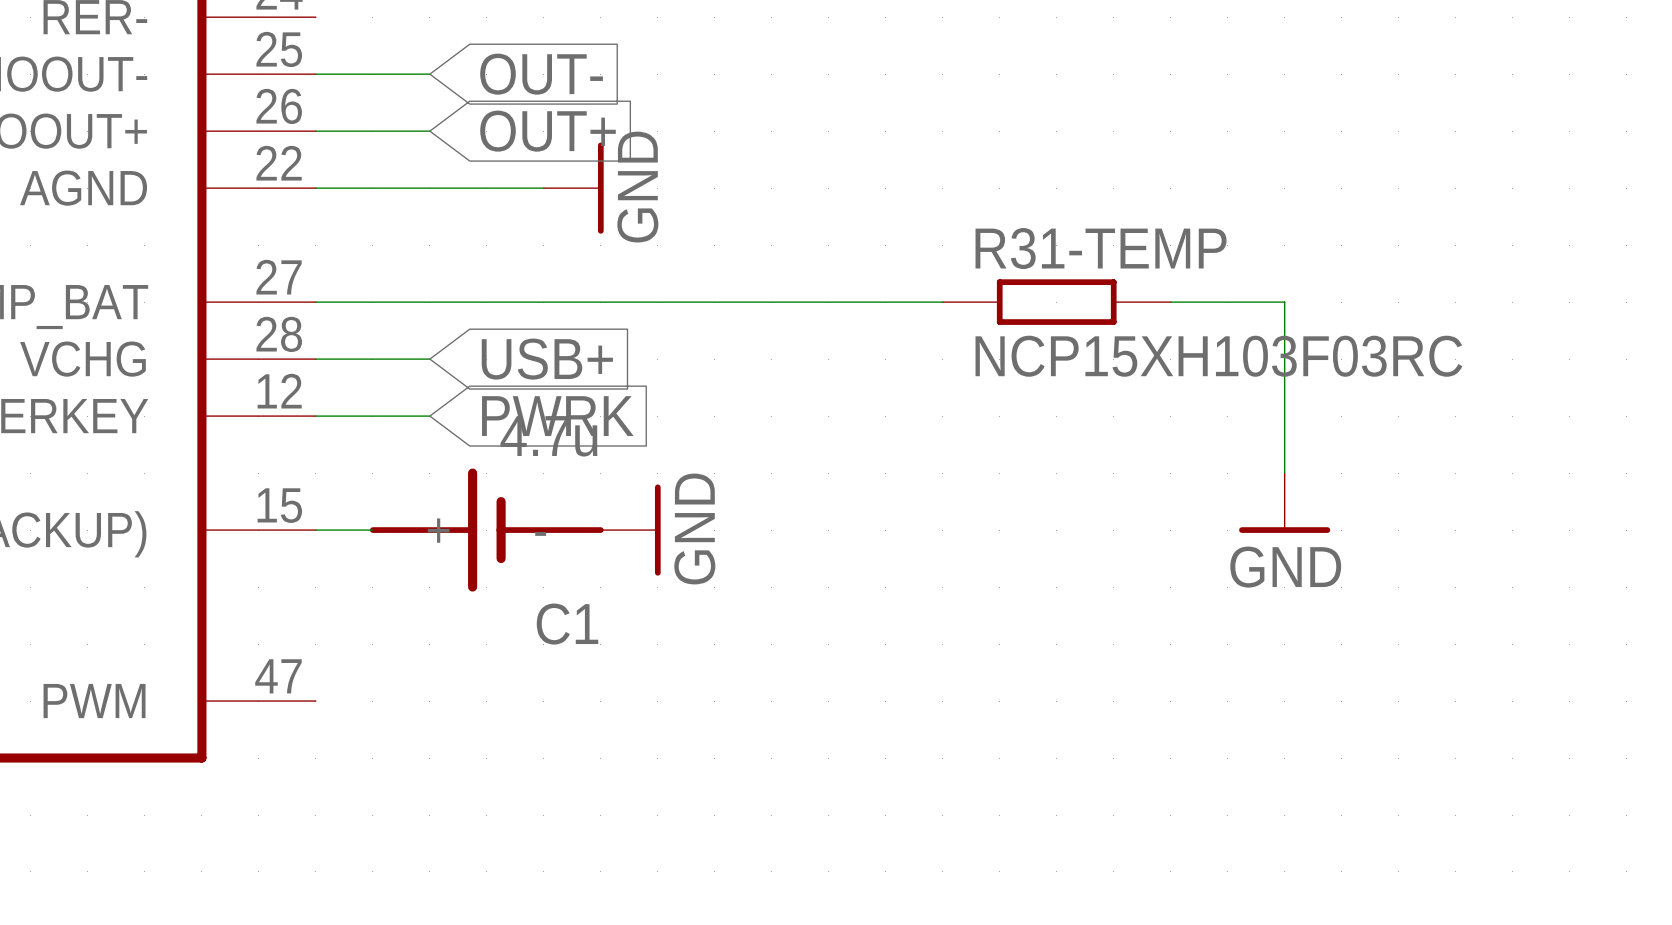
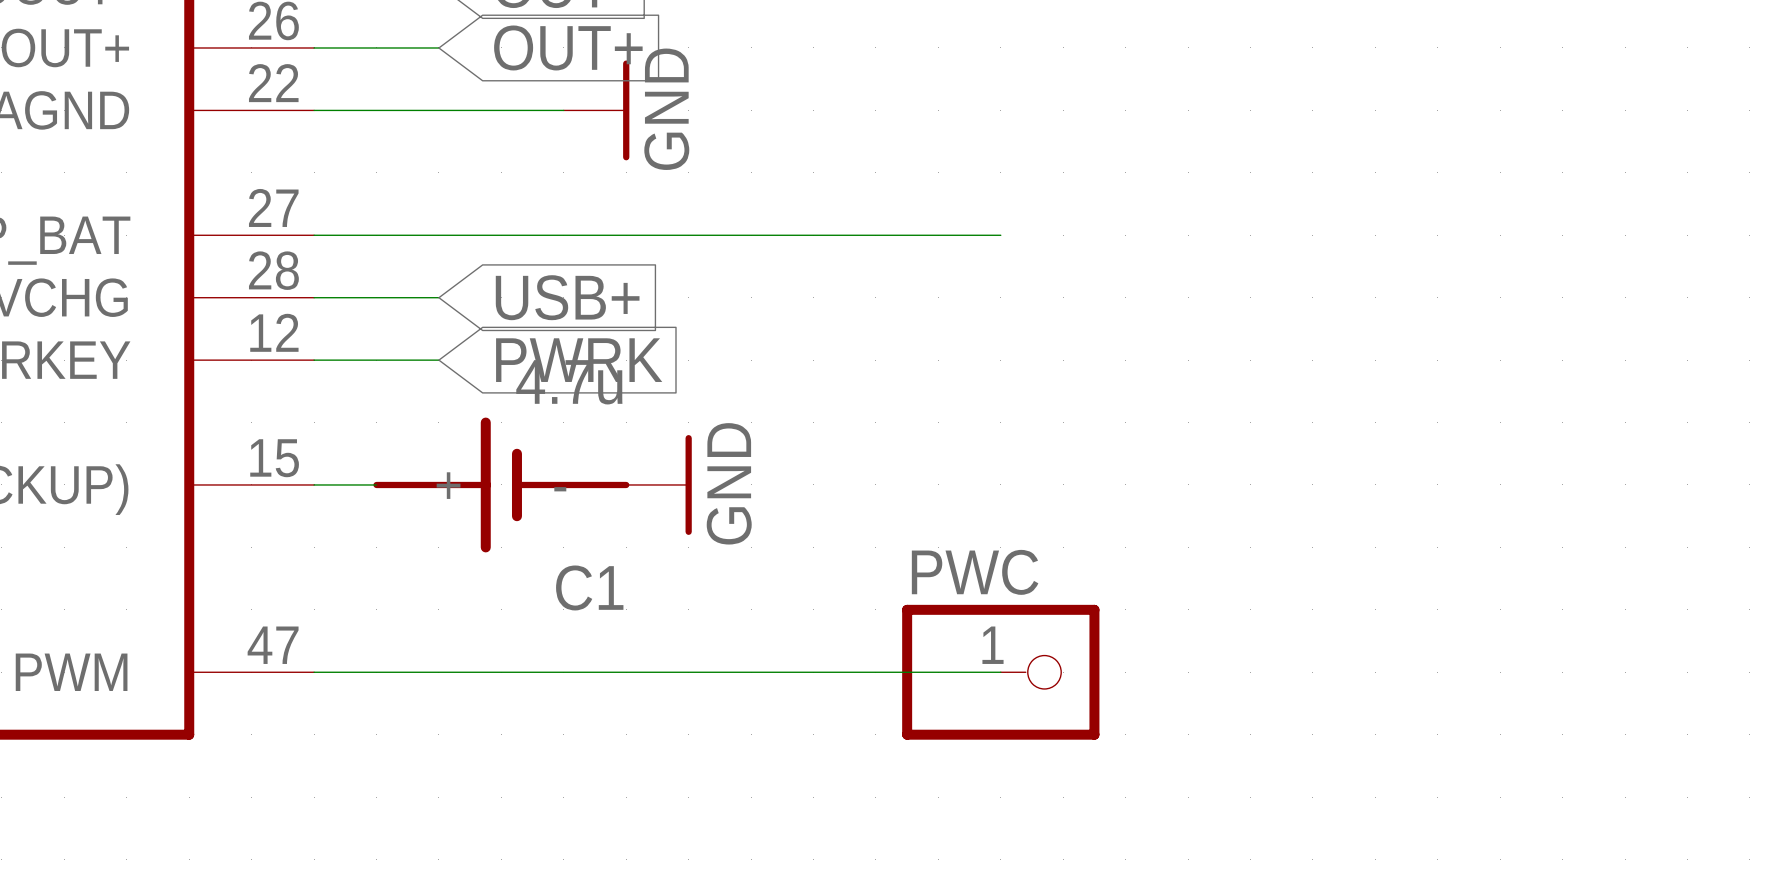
R31-TEMP: NCP15XH103F03RC (1056, 302) -> none
wire: (1170, 302) (1284, 302) (1284, 473) -> none
power symbol: GND (1284, 502) -> none
wire: none -> (314, 672) (1000, 672)
PWC: none -> (1000, 672)

